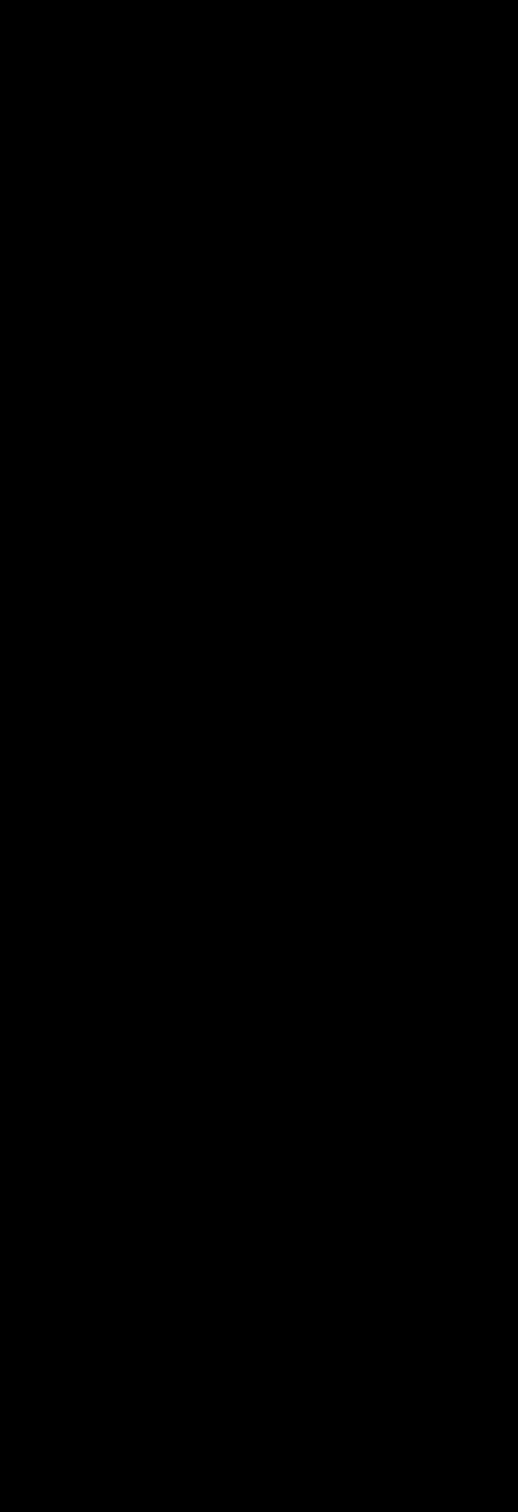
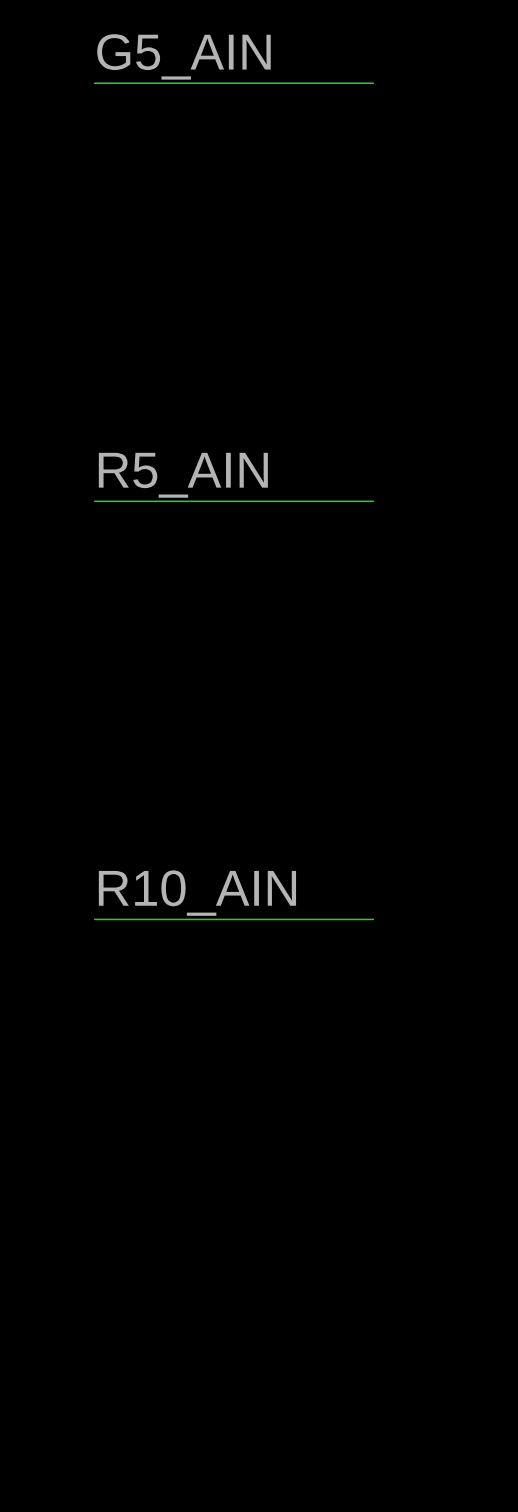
label: none -> G5_AIN (183, 56)
wire: none -> (94, 83) (373, 83)
label: none -> R5_AIN (183, 475)
wire: none -> (94, 501) (373, 501)
label: none -> R10_AIN (197, 893)
wire: none -> (94, 919) (373, 919)

